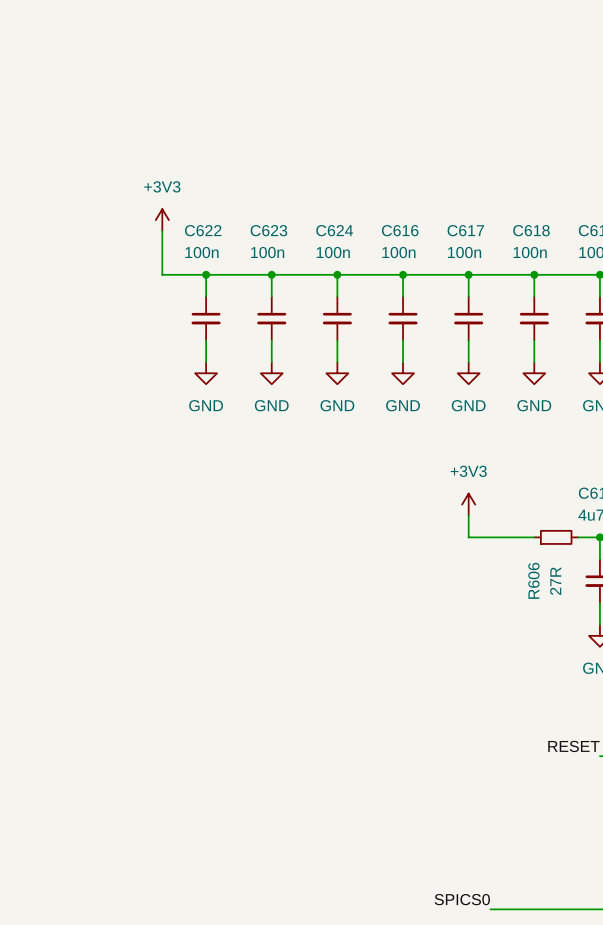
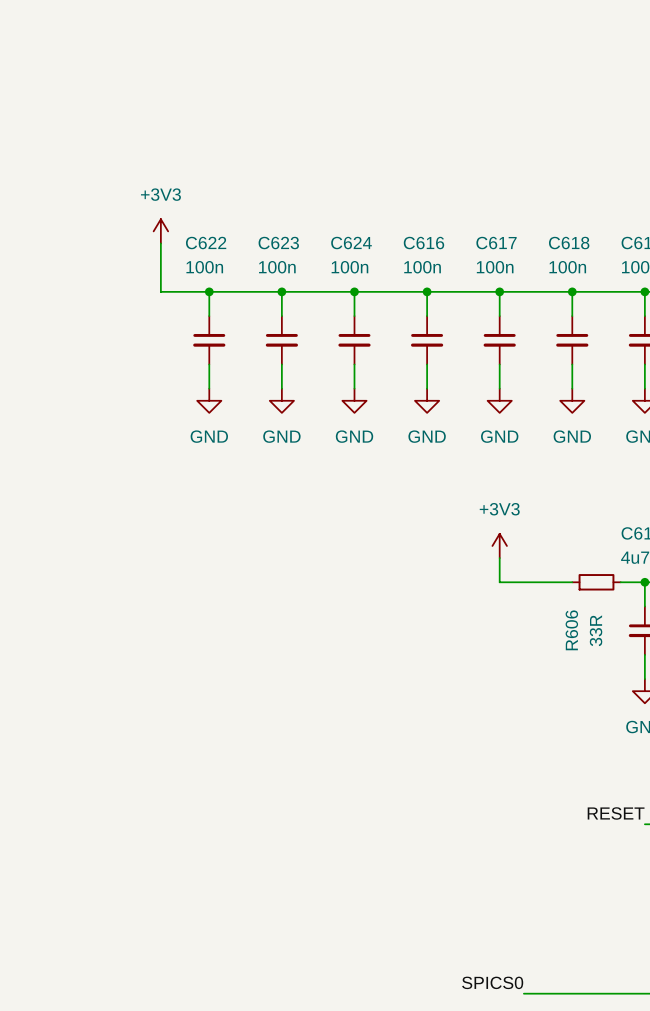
R606 value: 27R (555, 581) -> 33R (596, 630)

